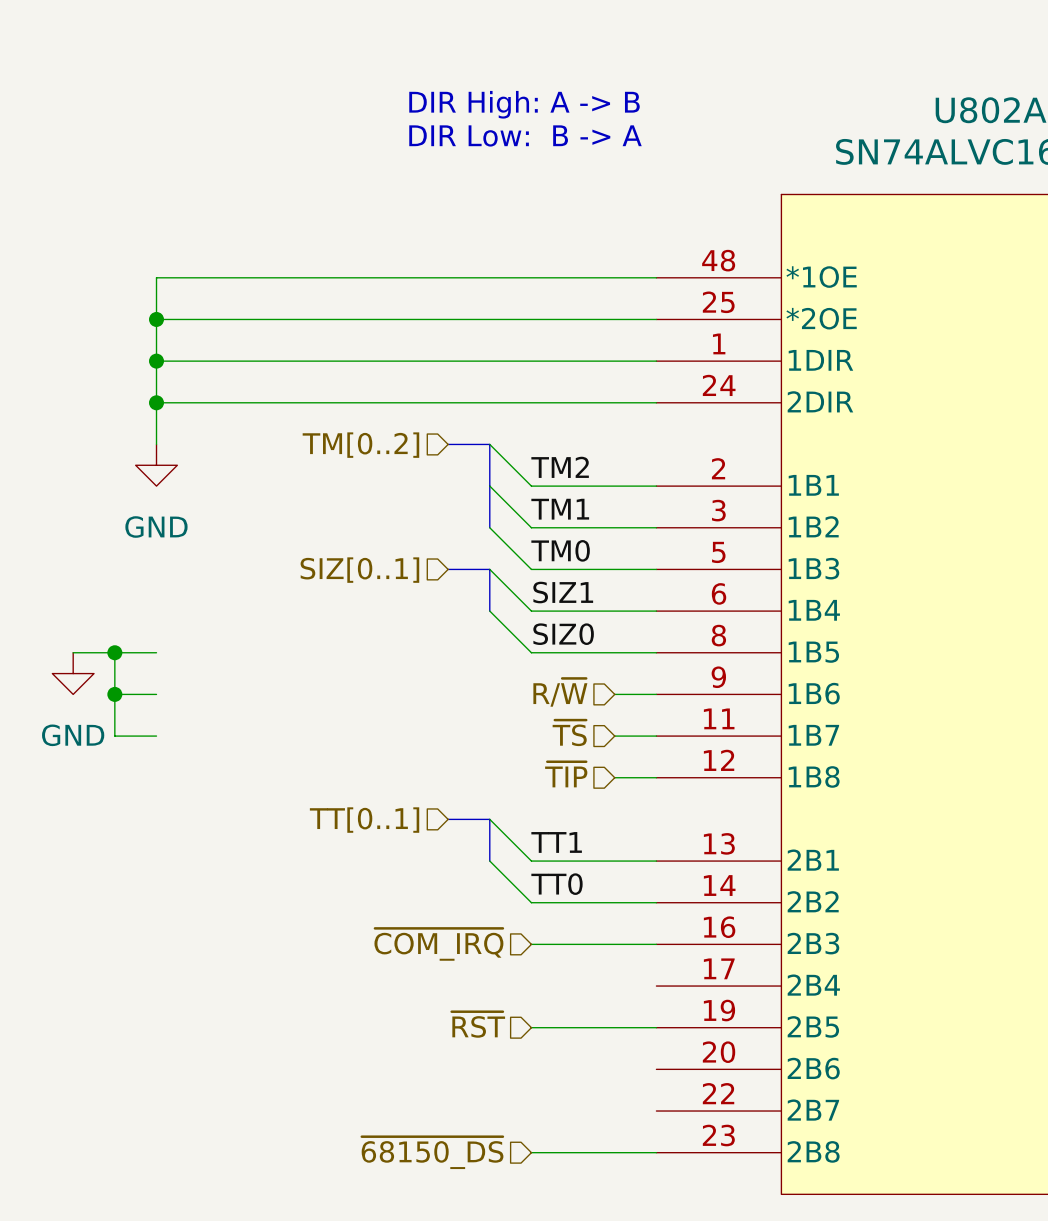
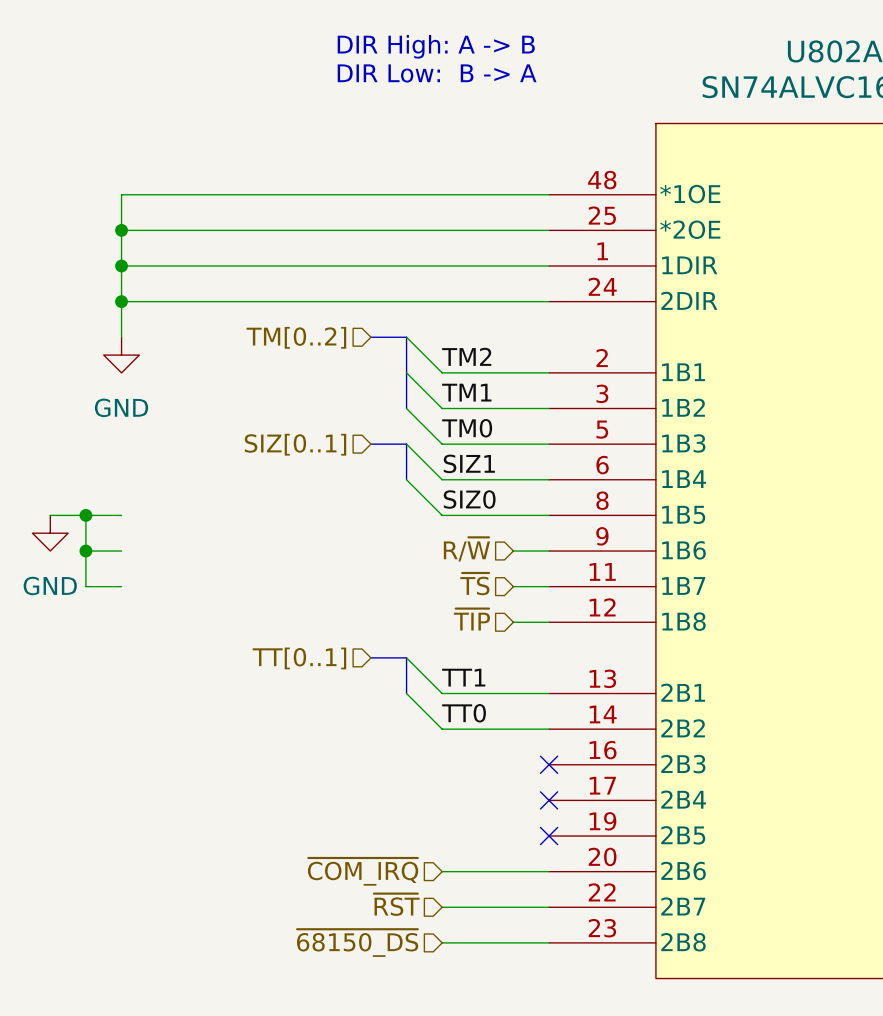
hierarchical label position: ~{COM_IRQ} (438, 944) -> ~{COM_IRQ} (363, 871)
wire: (531, 944) (656, 944) -> (442, 907) (549, 907)
no-connect mark: none -> (549, 764)
no-connect mark: none -> (549, 800)
hierarchical label position: ~{RST} (478, 1024) -> ~{RST} (396, 904)
wire: (531, 1027) (656, 1027) -> (442, 871) (549, 871)
no-connect mark: none -> (549, 836)

